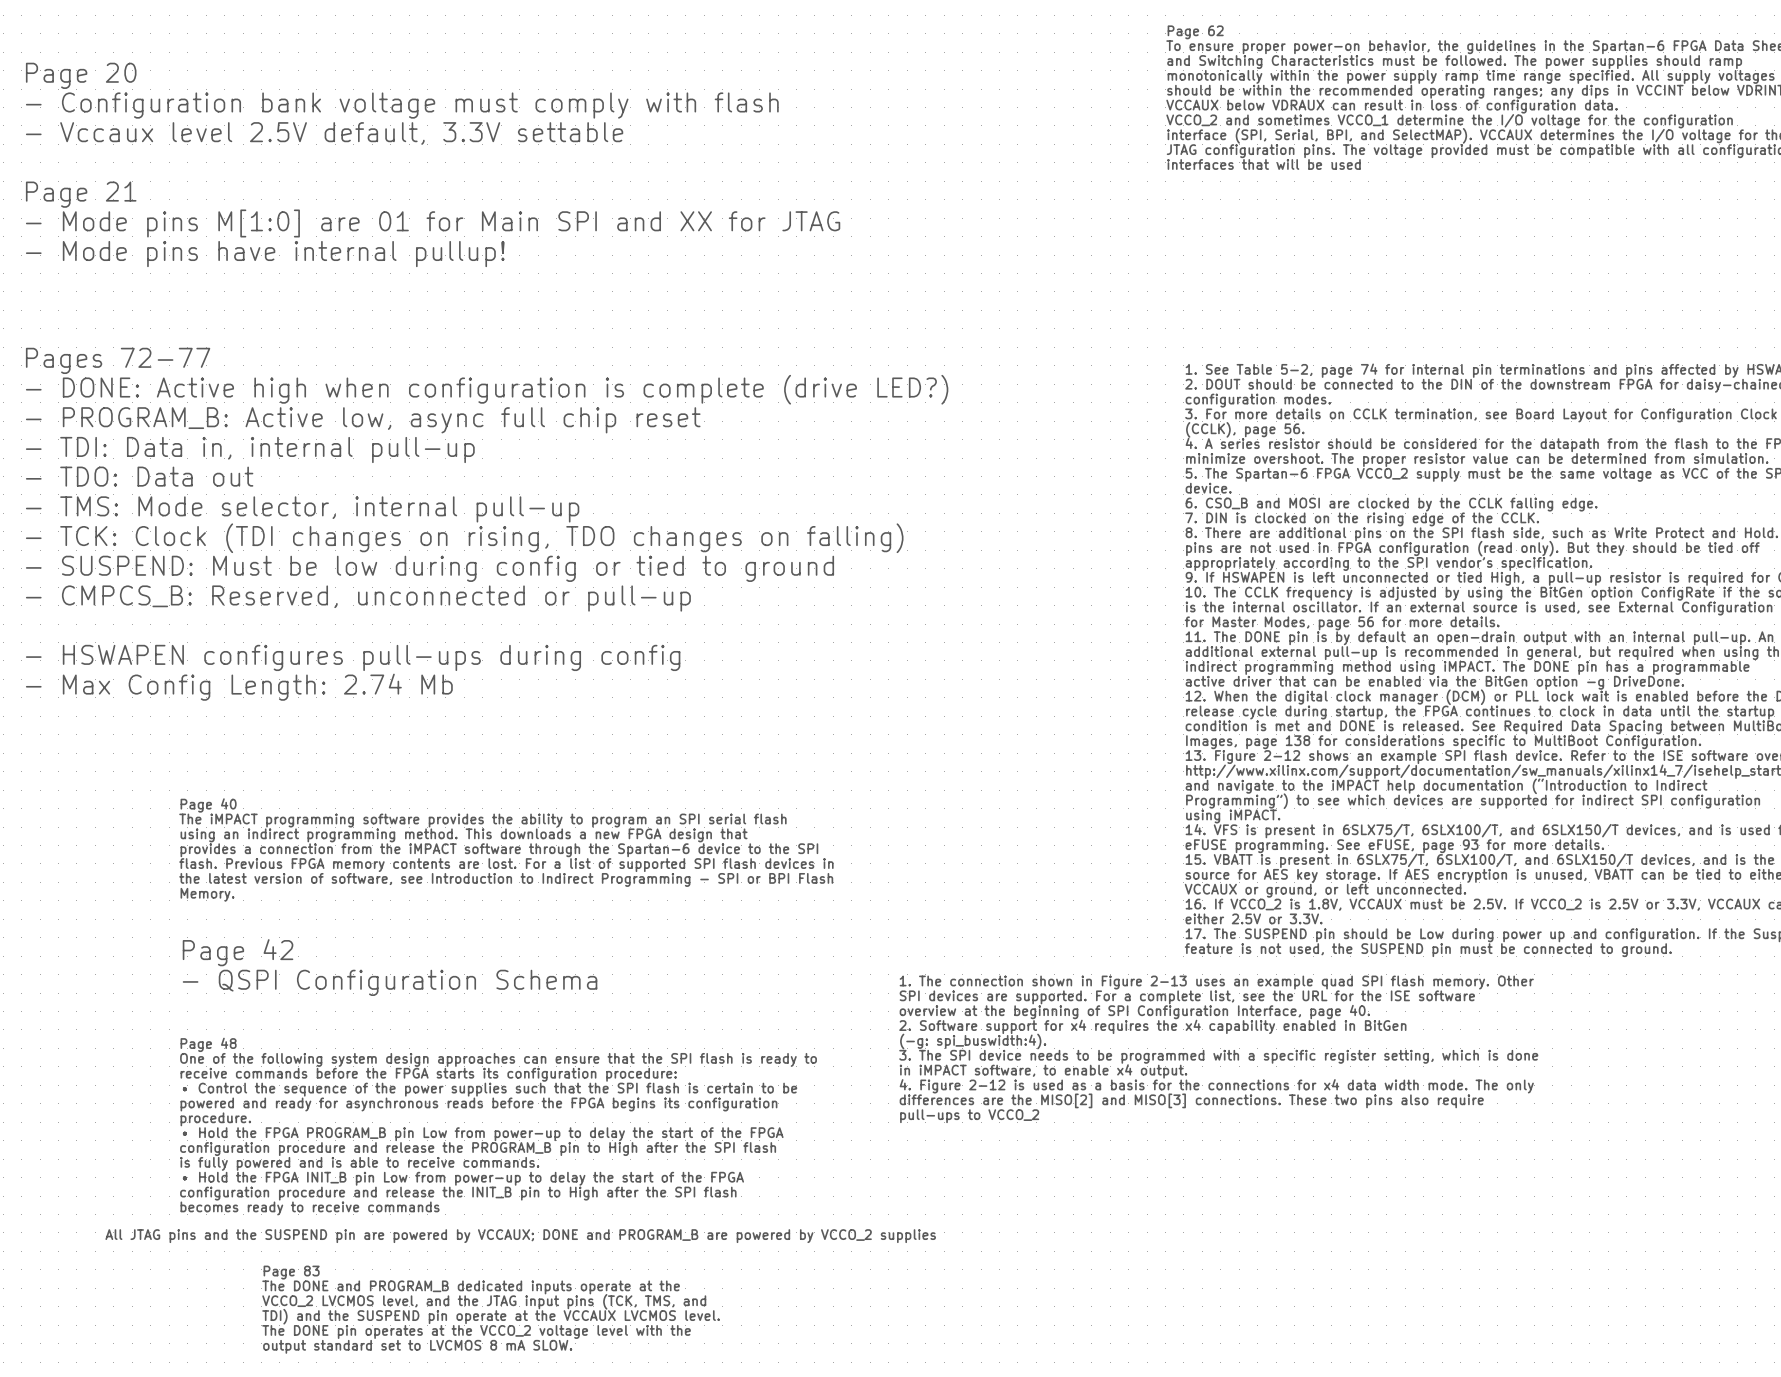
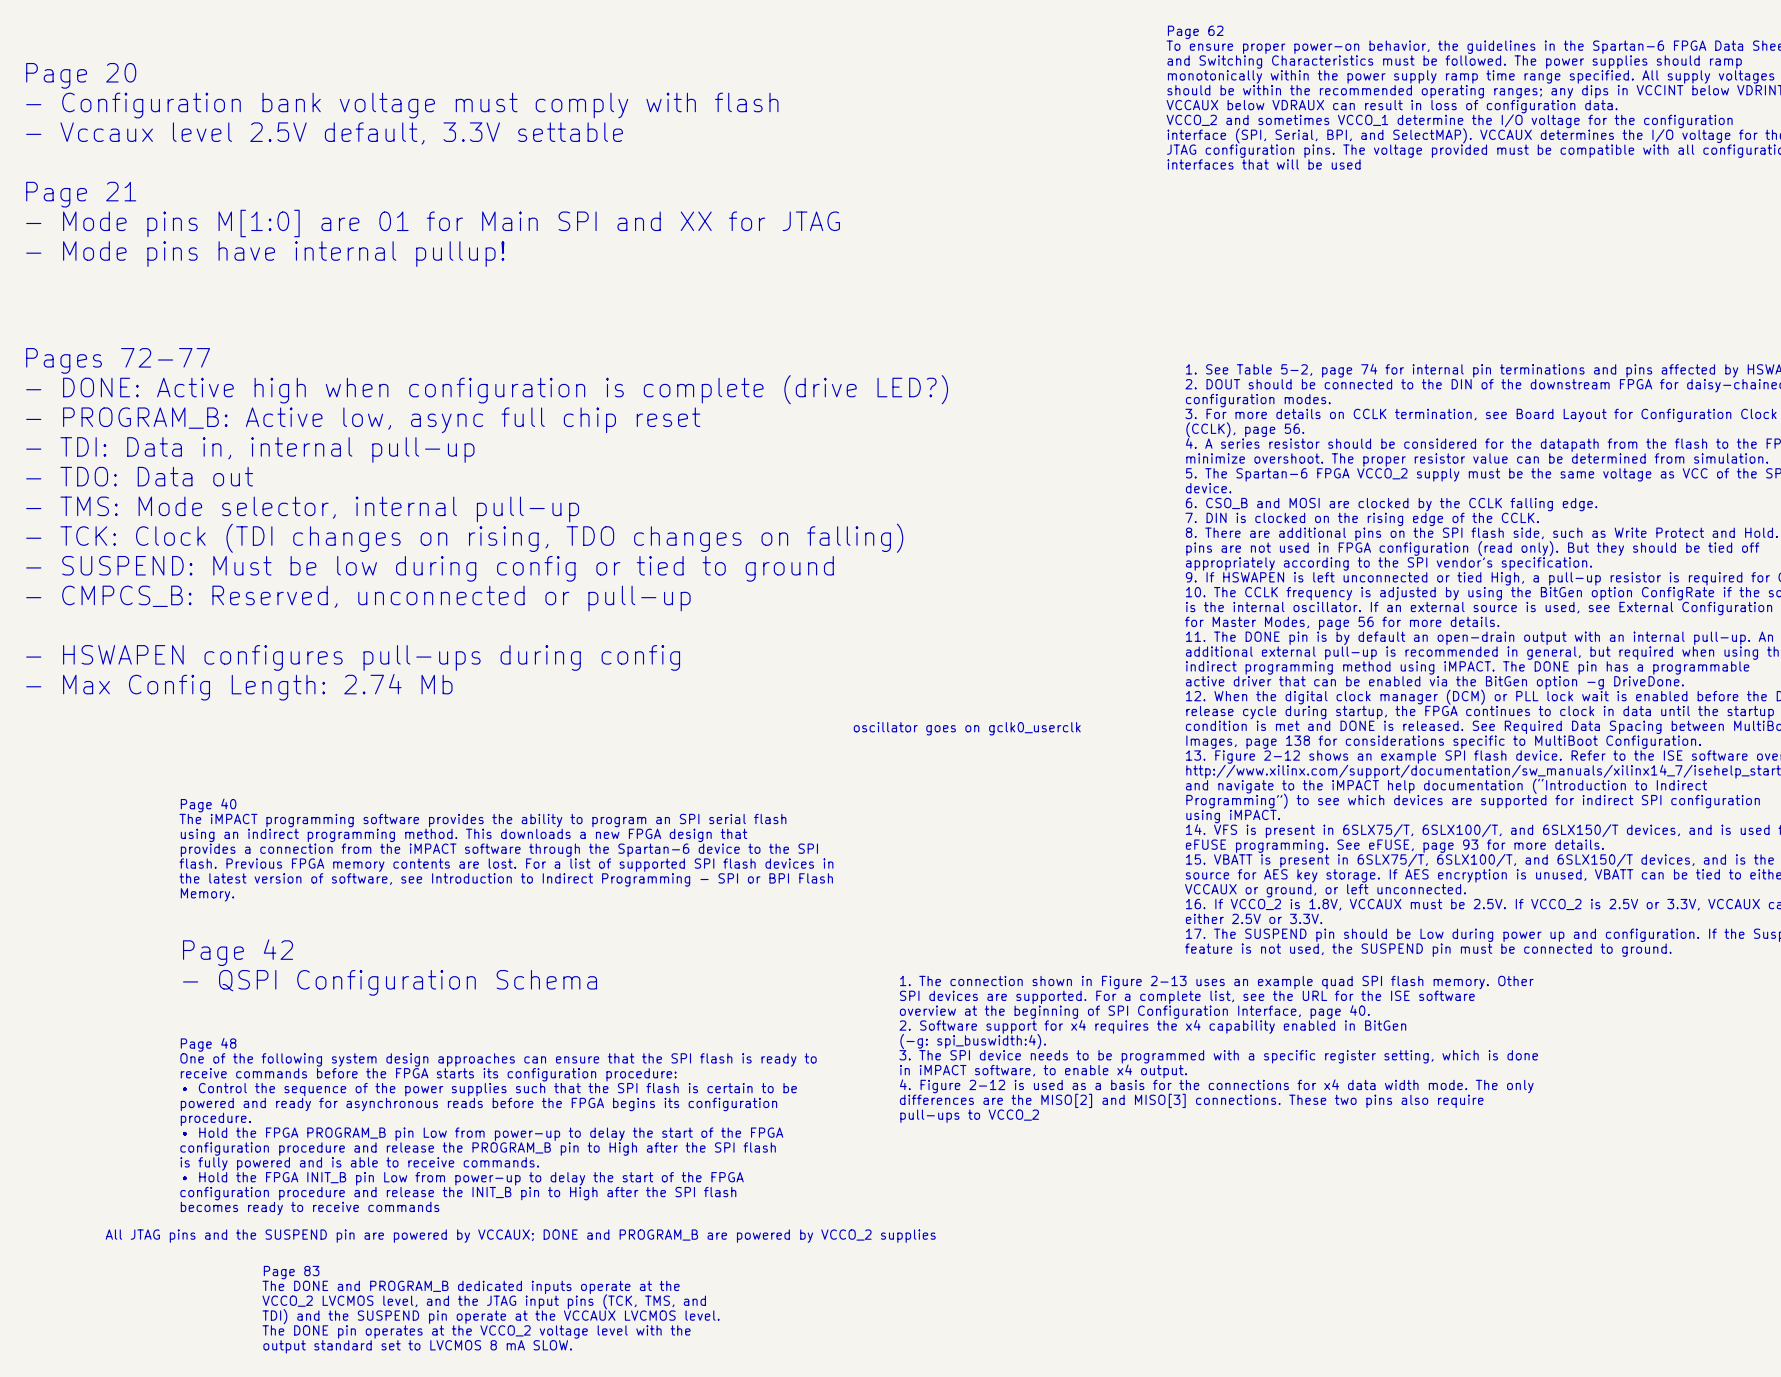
text: none -> oscillator goes on gclk0_userclk (967, 728)

